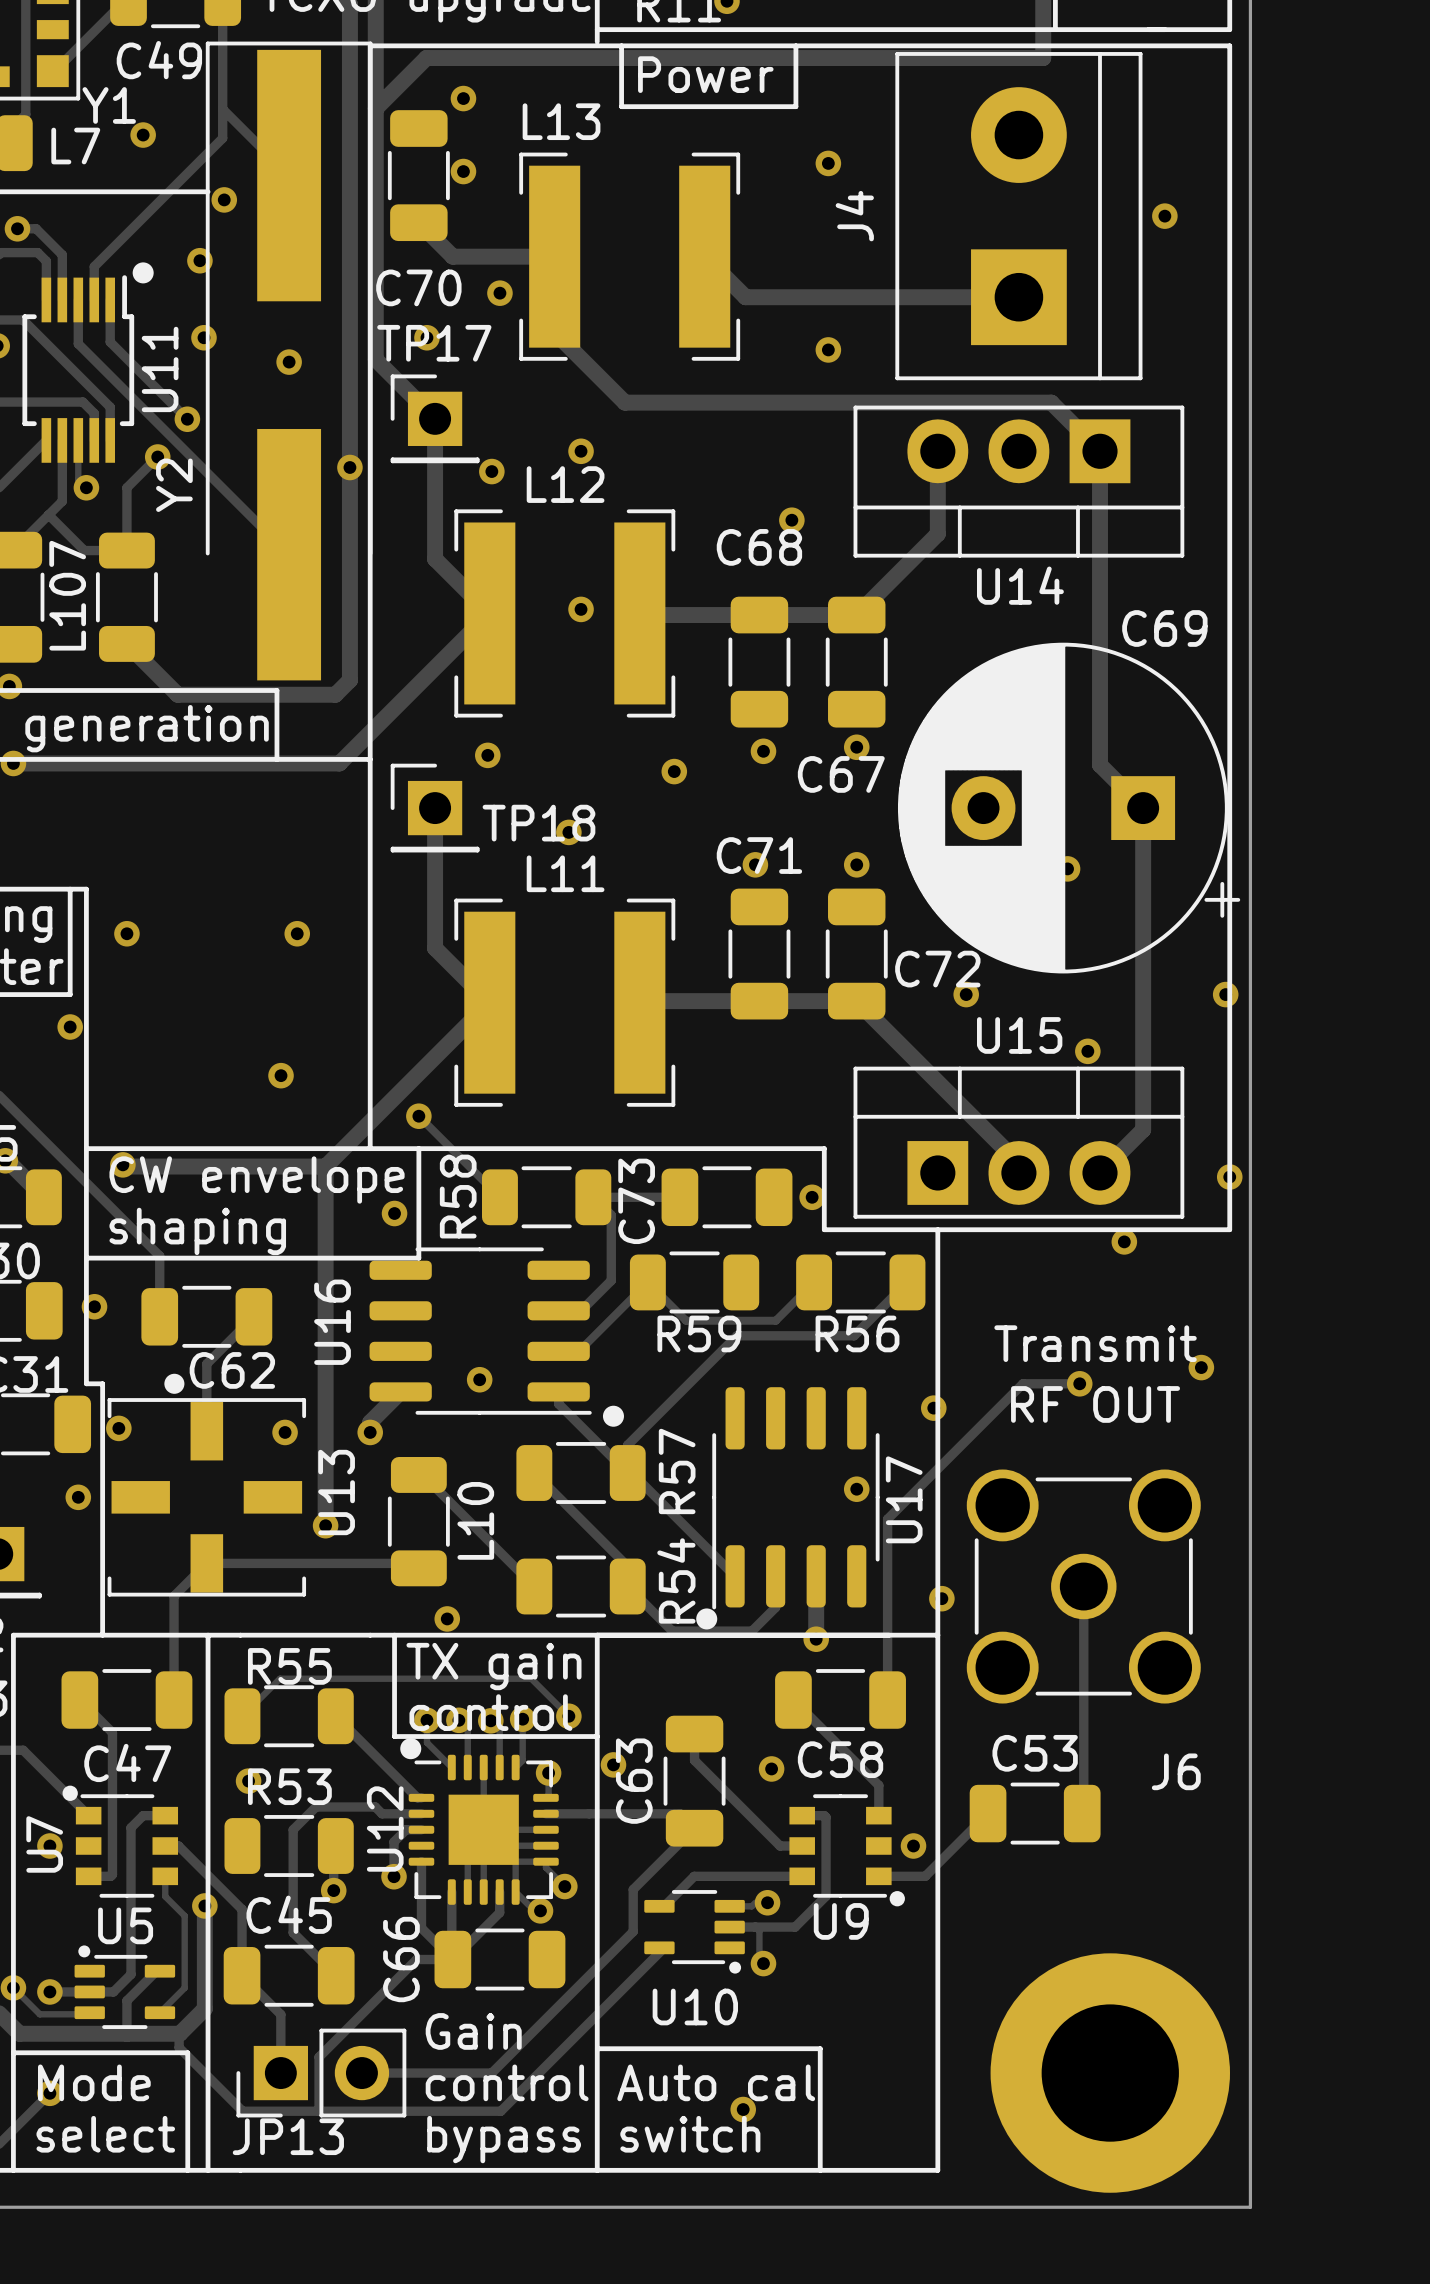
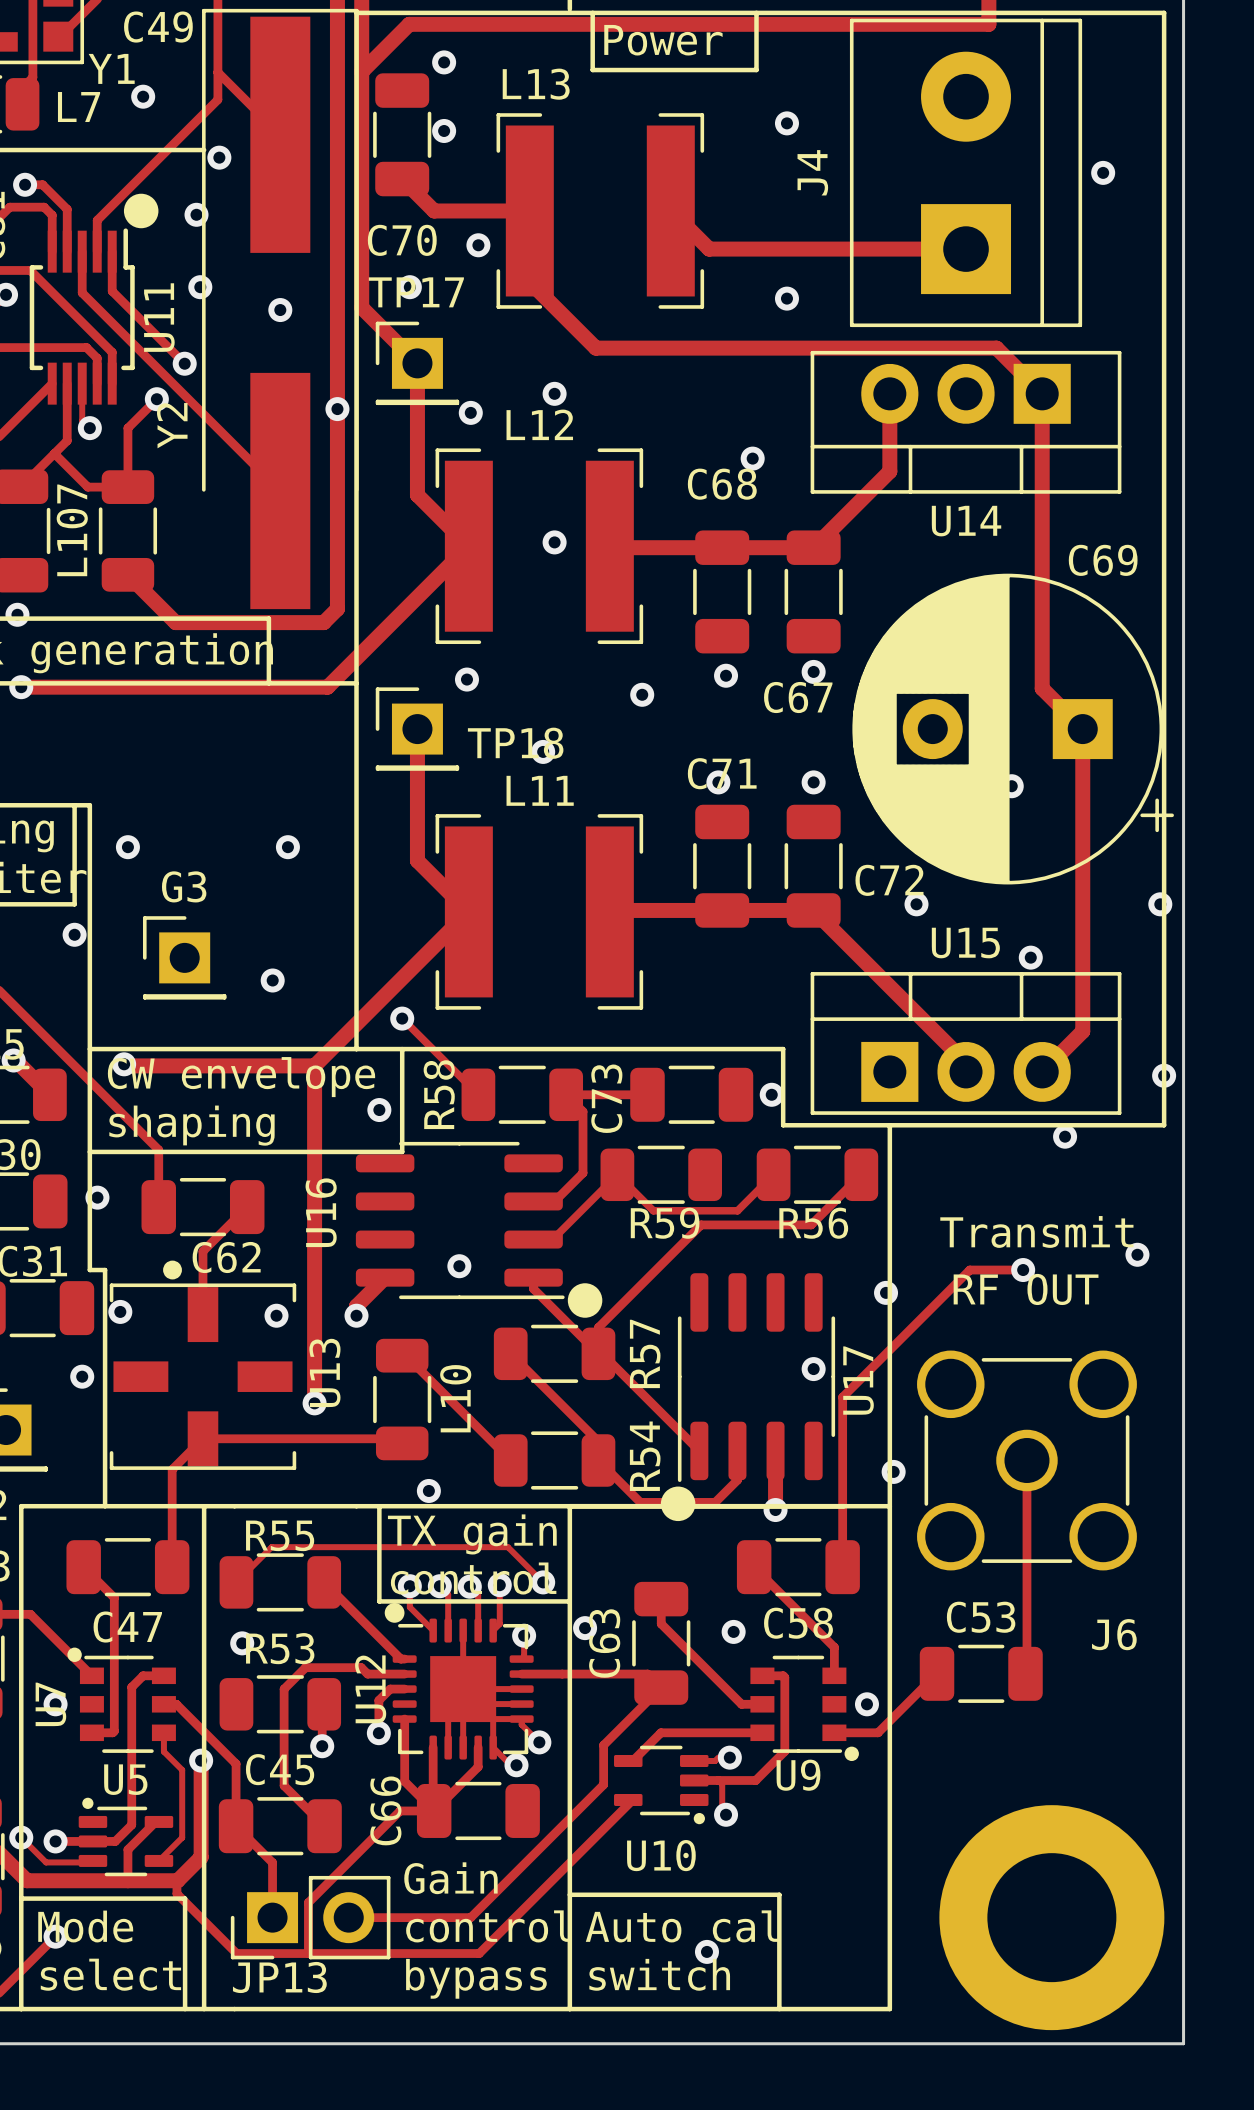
drawing shape: [132, 262, 154, 284] -> [123, 193, 159, 229]
G3: none -> (184, 957)
drawing shape: [602, 1405, 624, 1427] -> [567, 1283, 603, 1318]
drawing shape: [696, 1608, 718, 1630] -> [660, 1486, 696, 1522]

